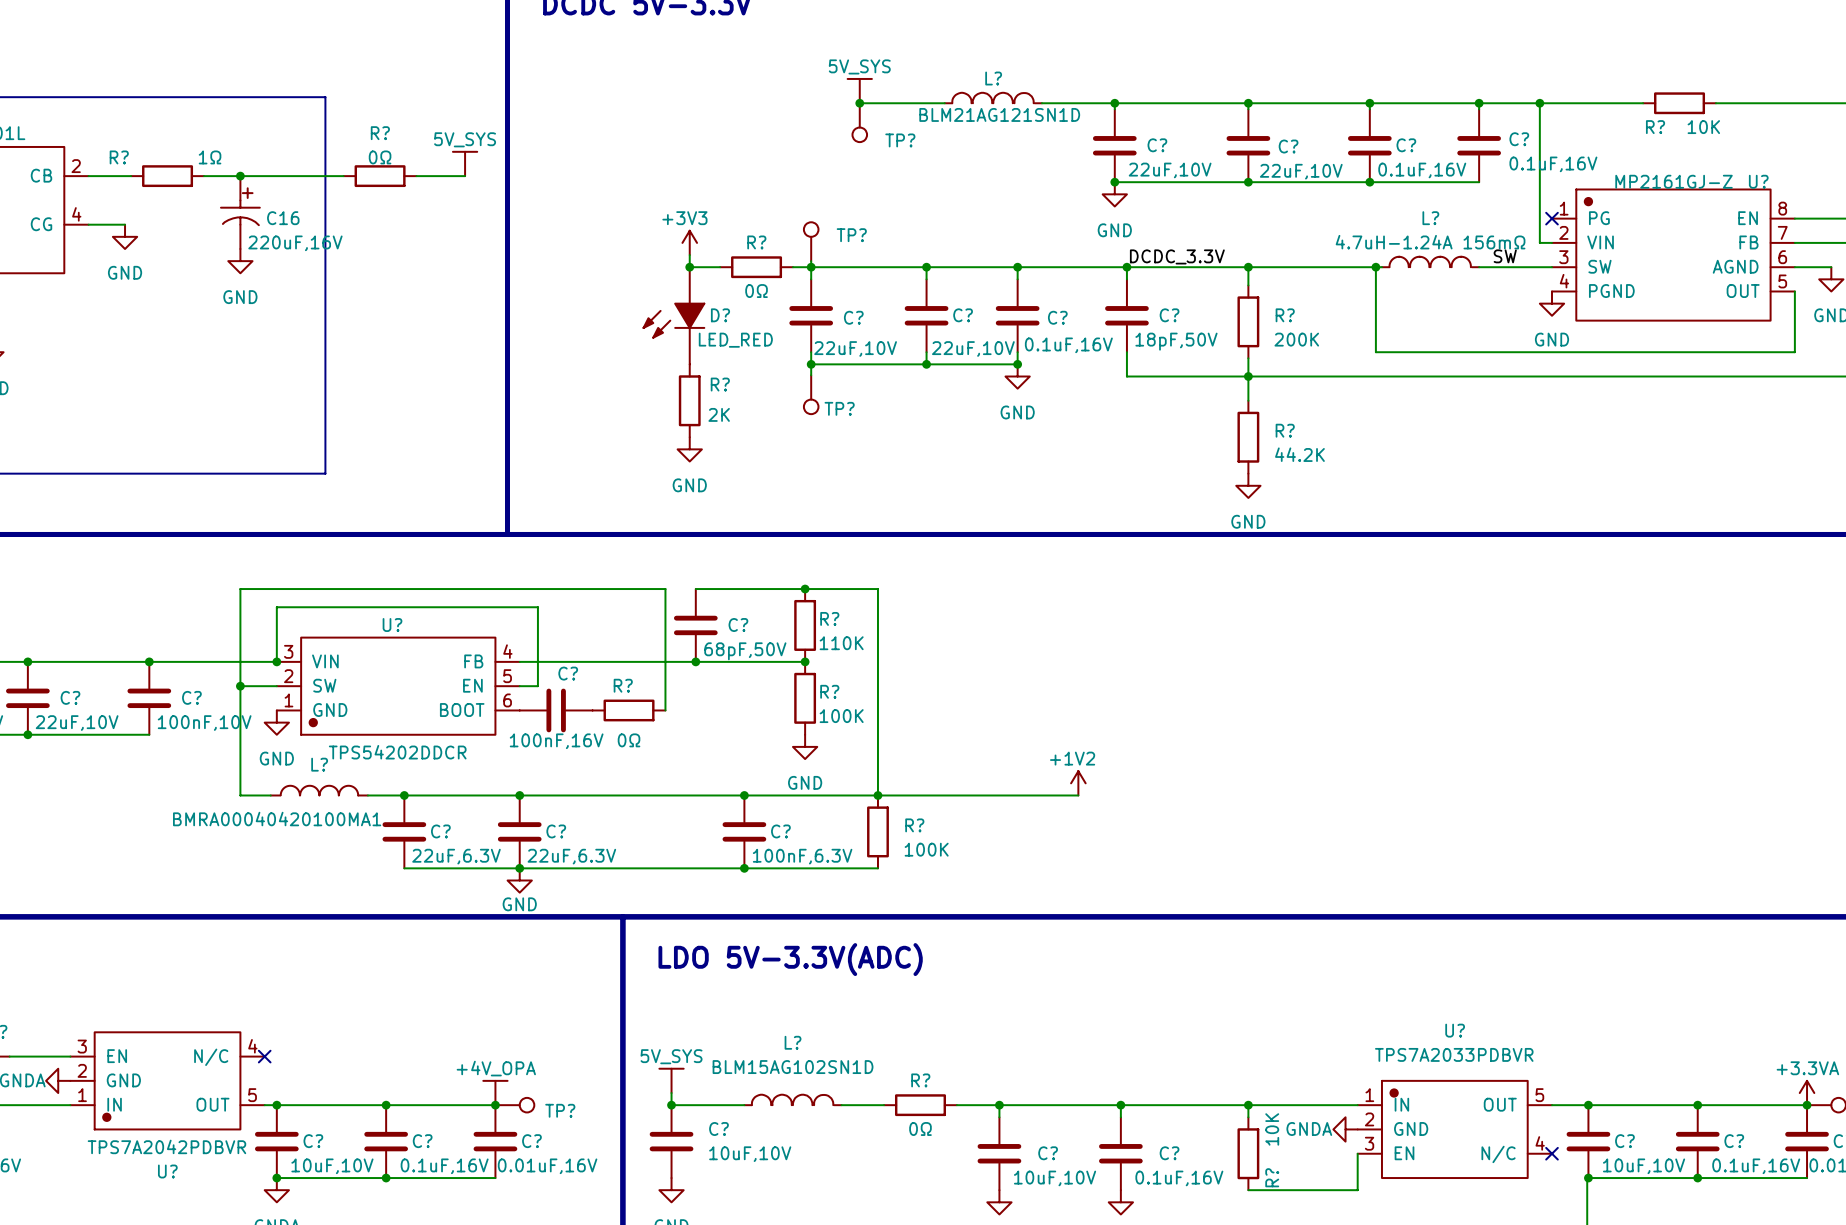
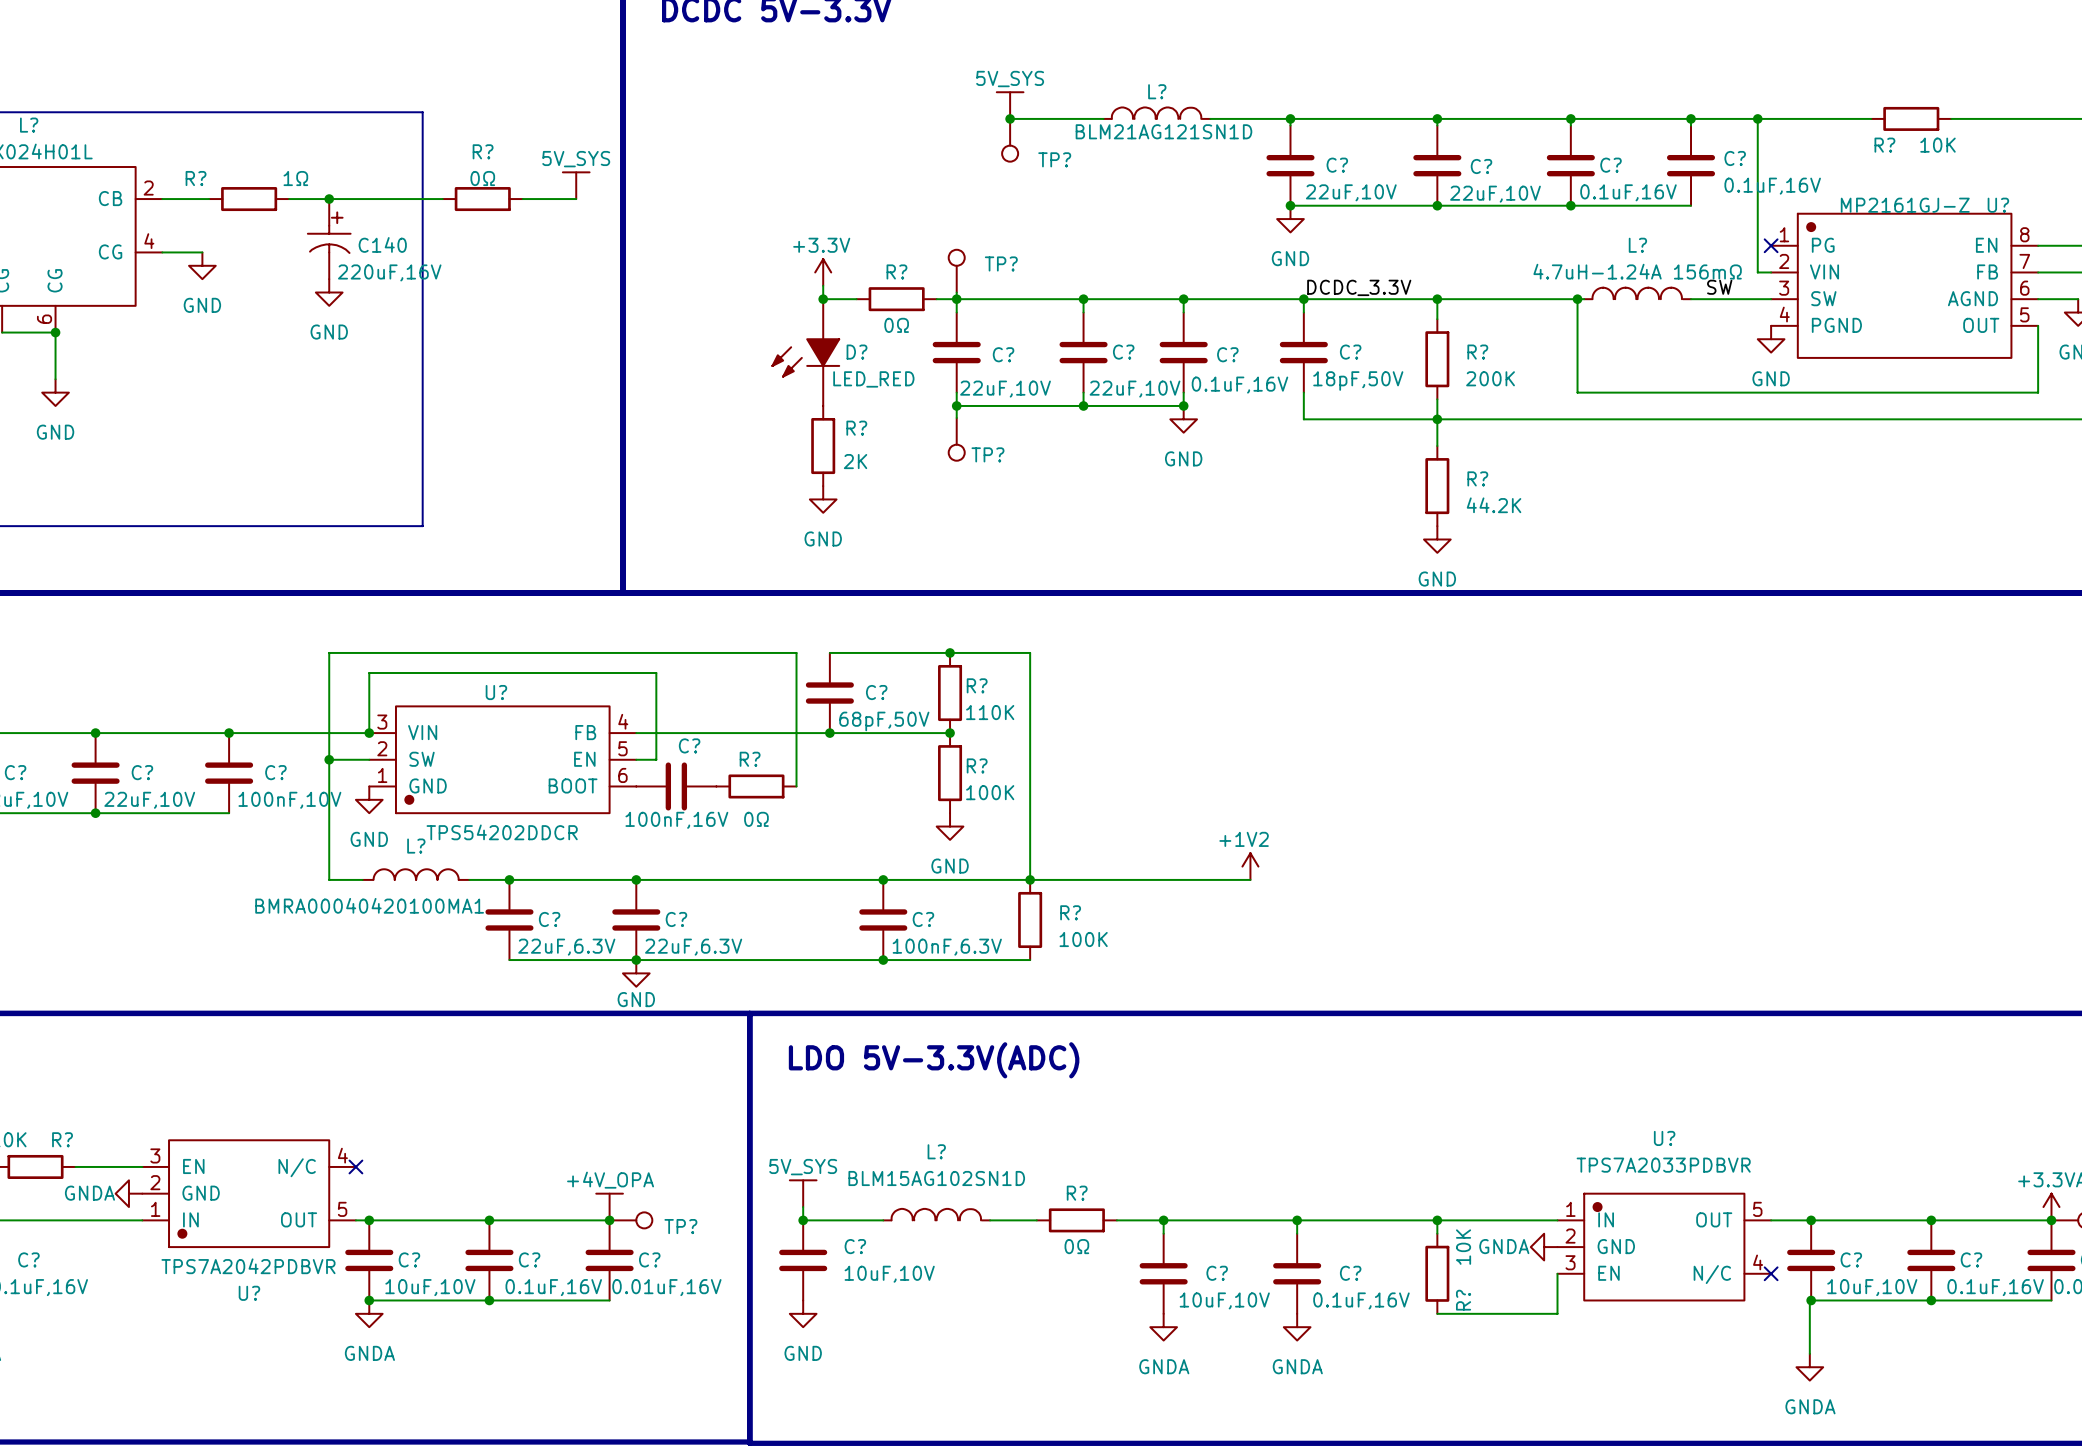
C16 name: C16 (283, 218) -> C140 (382, 244)
power symbol: +3V3 (689, 242) -> +3.3V (823, 272)

